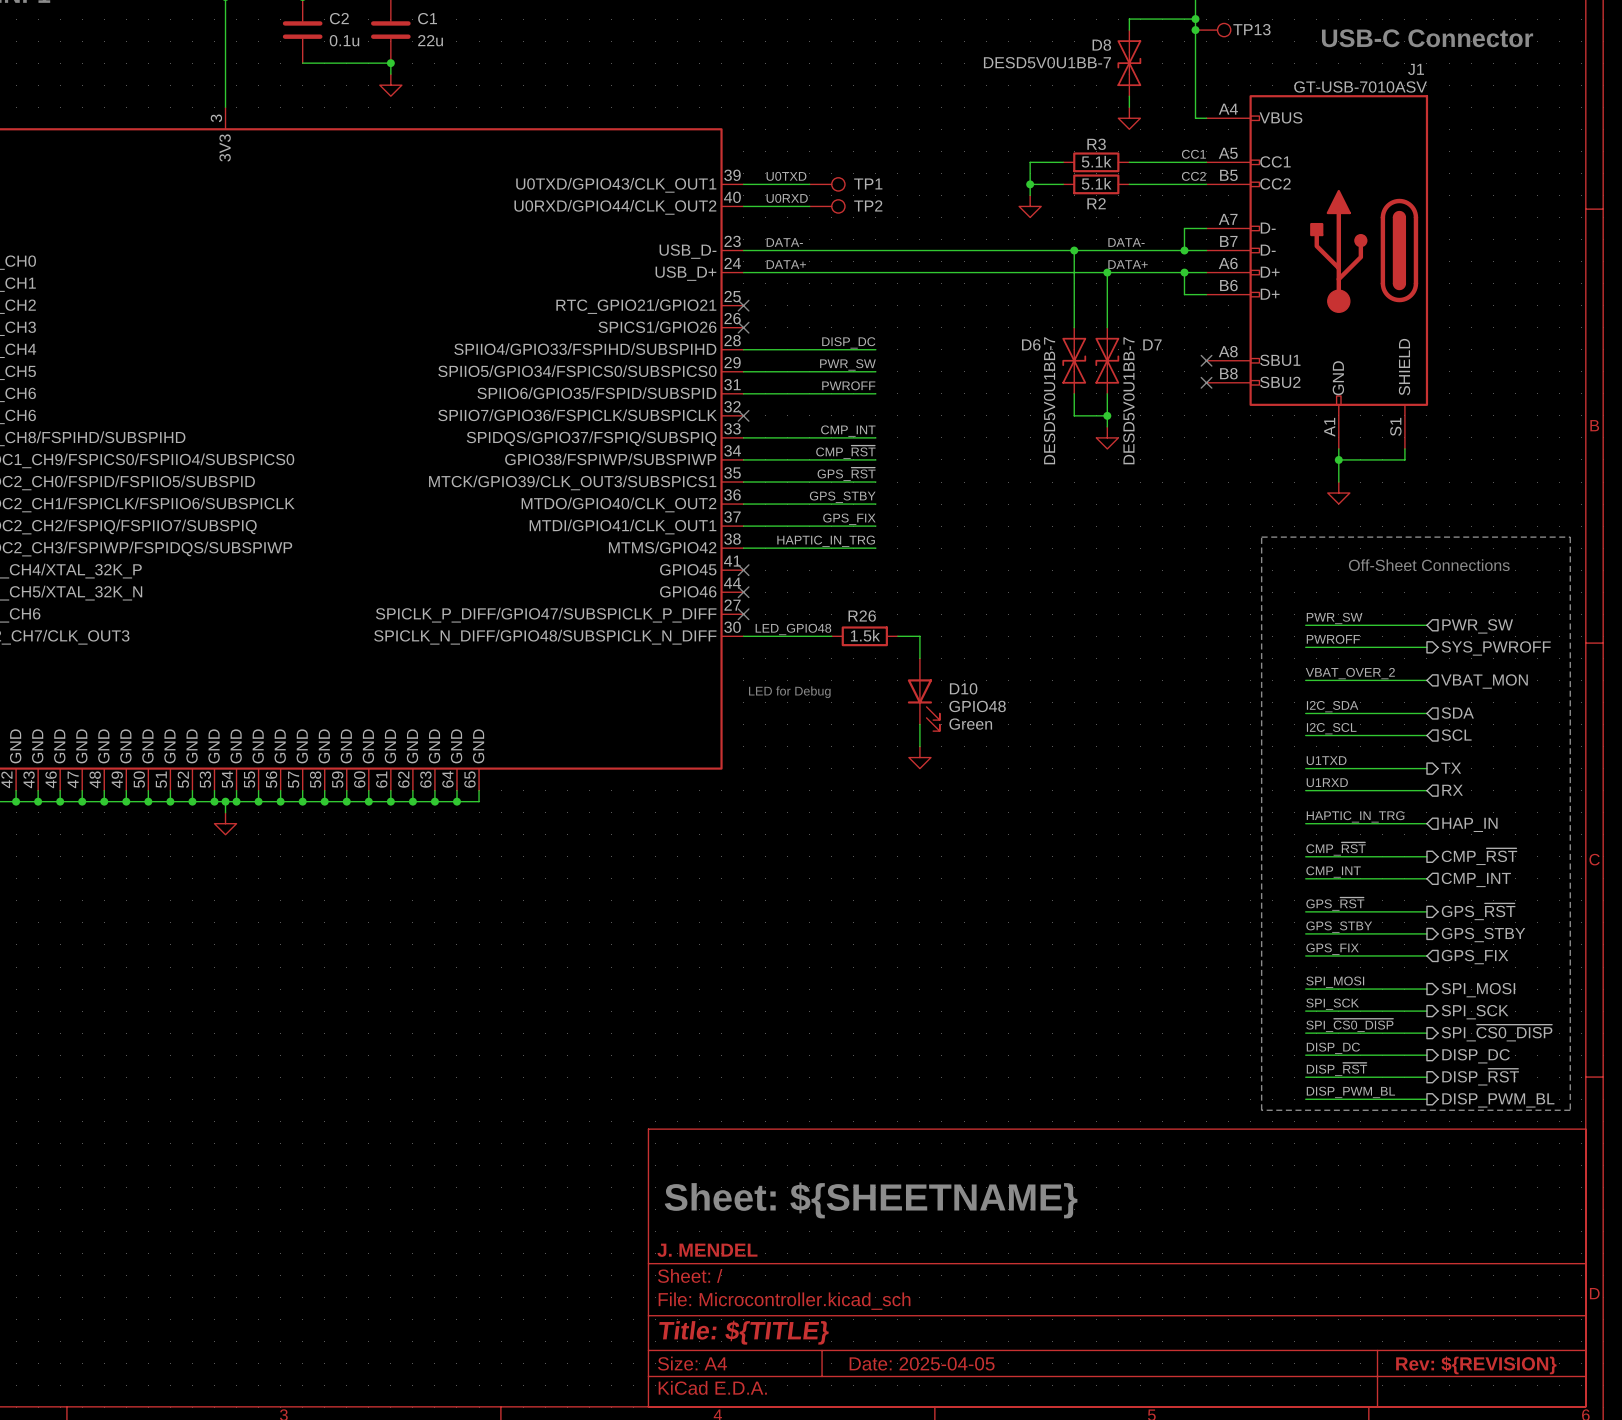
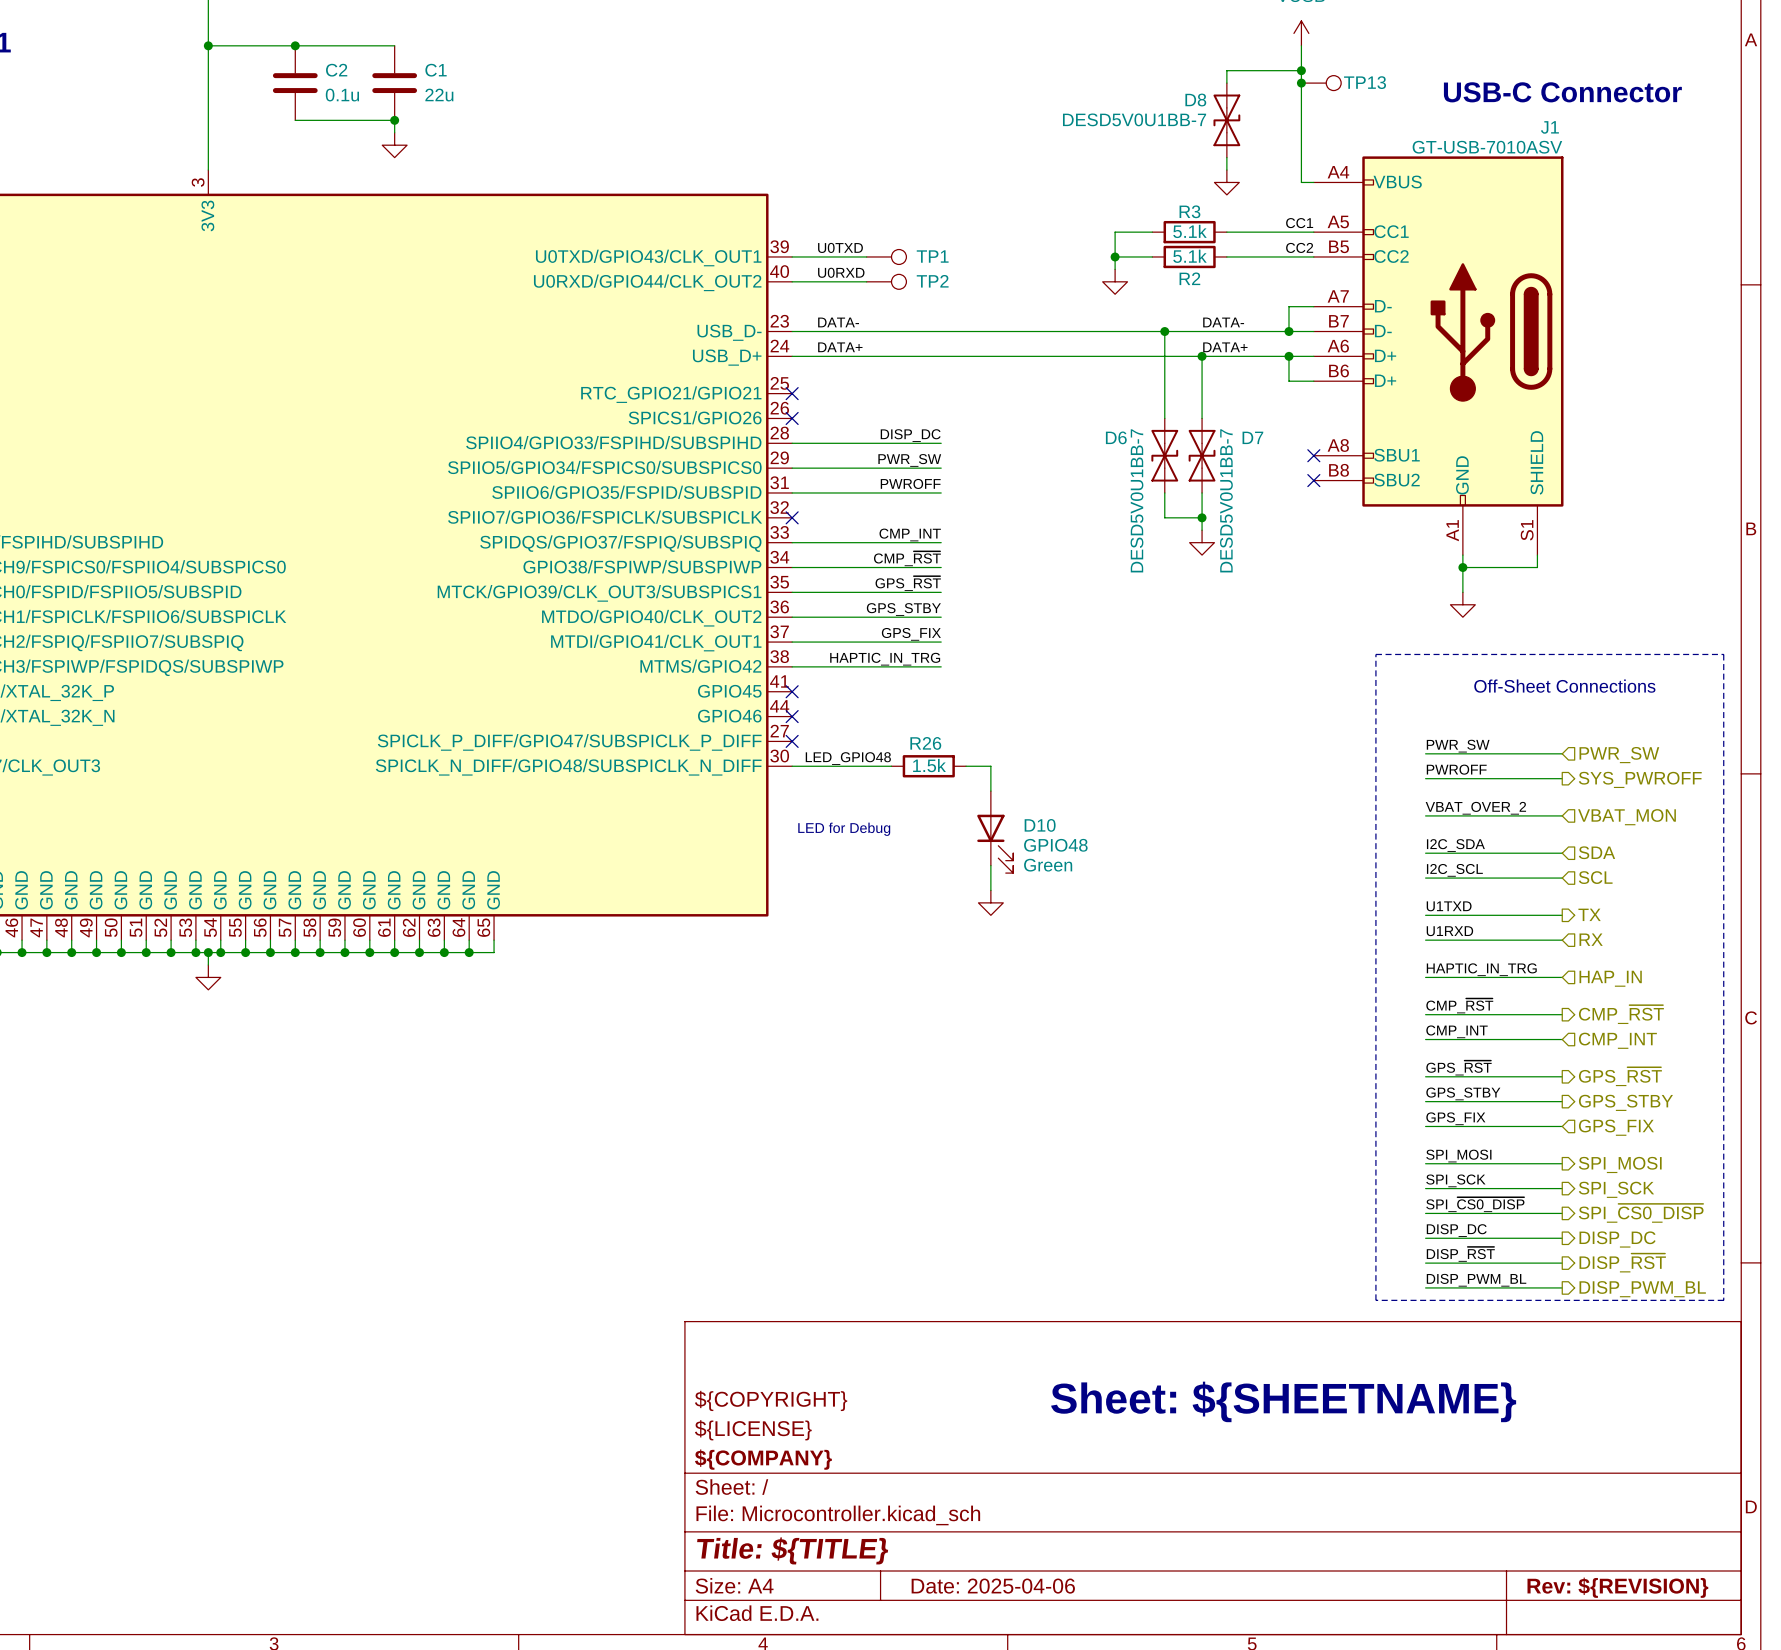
title block: none -> ${COPYRIGHT} (771, 1400)
text: Sheet: ${SHEETNAME} (871, 1200) -> none
text: none -> Sheet: ${SHEETNAME} (1283, 1401)
title block: none -> ${LICENSE} (753, 1430)
title block: J. MENDEL (707, 1250) -> ${COMPANY} (763, 1459)
title block: Date: 2025-04-05 (922, 1363) -> Date: 2025-04-06 (993, 1586)

